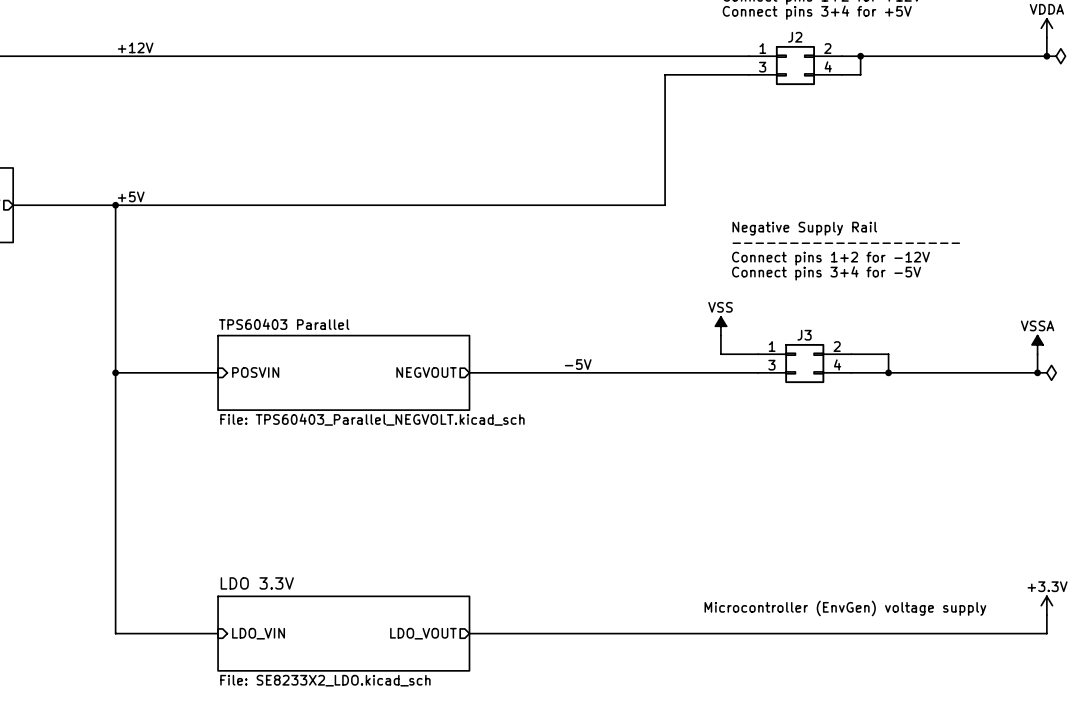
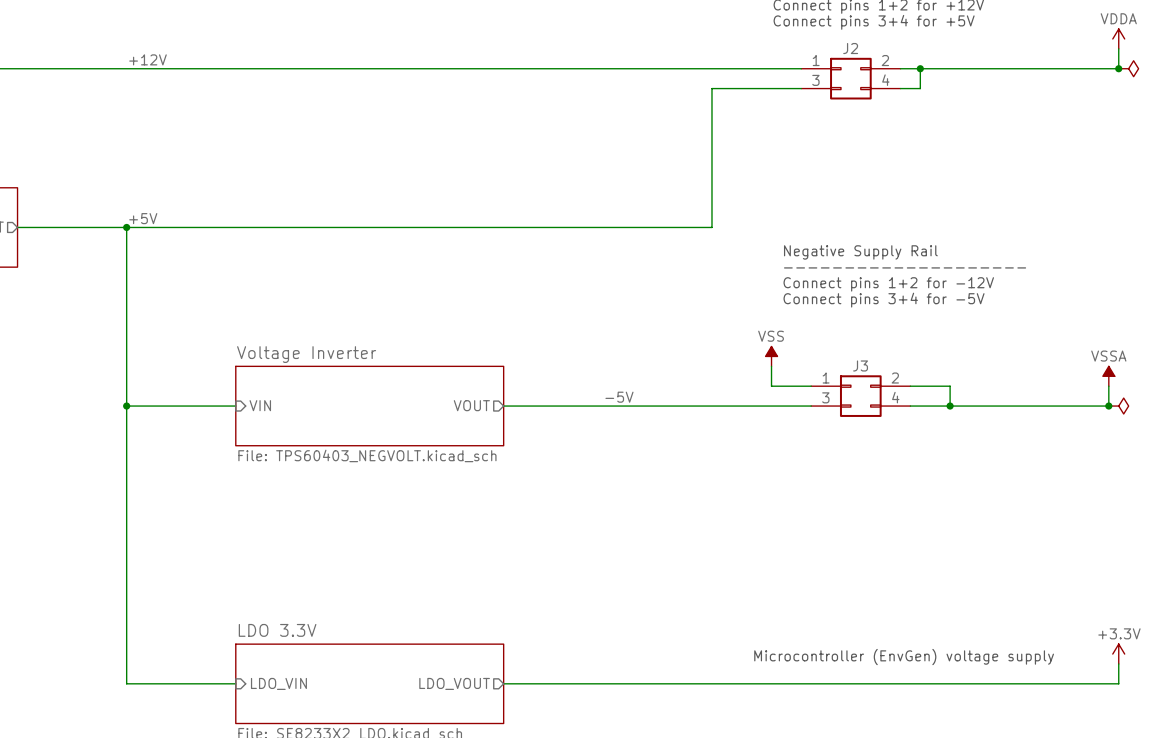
sheet TPS60403 Parallel name: TPS60403 Parallel (284, 324) -> Voltage Inverter (306, 354)
sheet pin: POSVIN (255, 372) -> VIN (260, 405)
sheet pin: NEGVOUT (426, 372) -> VOUT (471, 405)
sheet TPS60403 Parallel value: File: TPS60403_Parallel_NEGVOLT.kicad_sch (372, 419) -> File: TPS60403_NEGVOLT.kicad_sch (367, 455)

